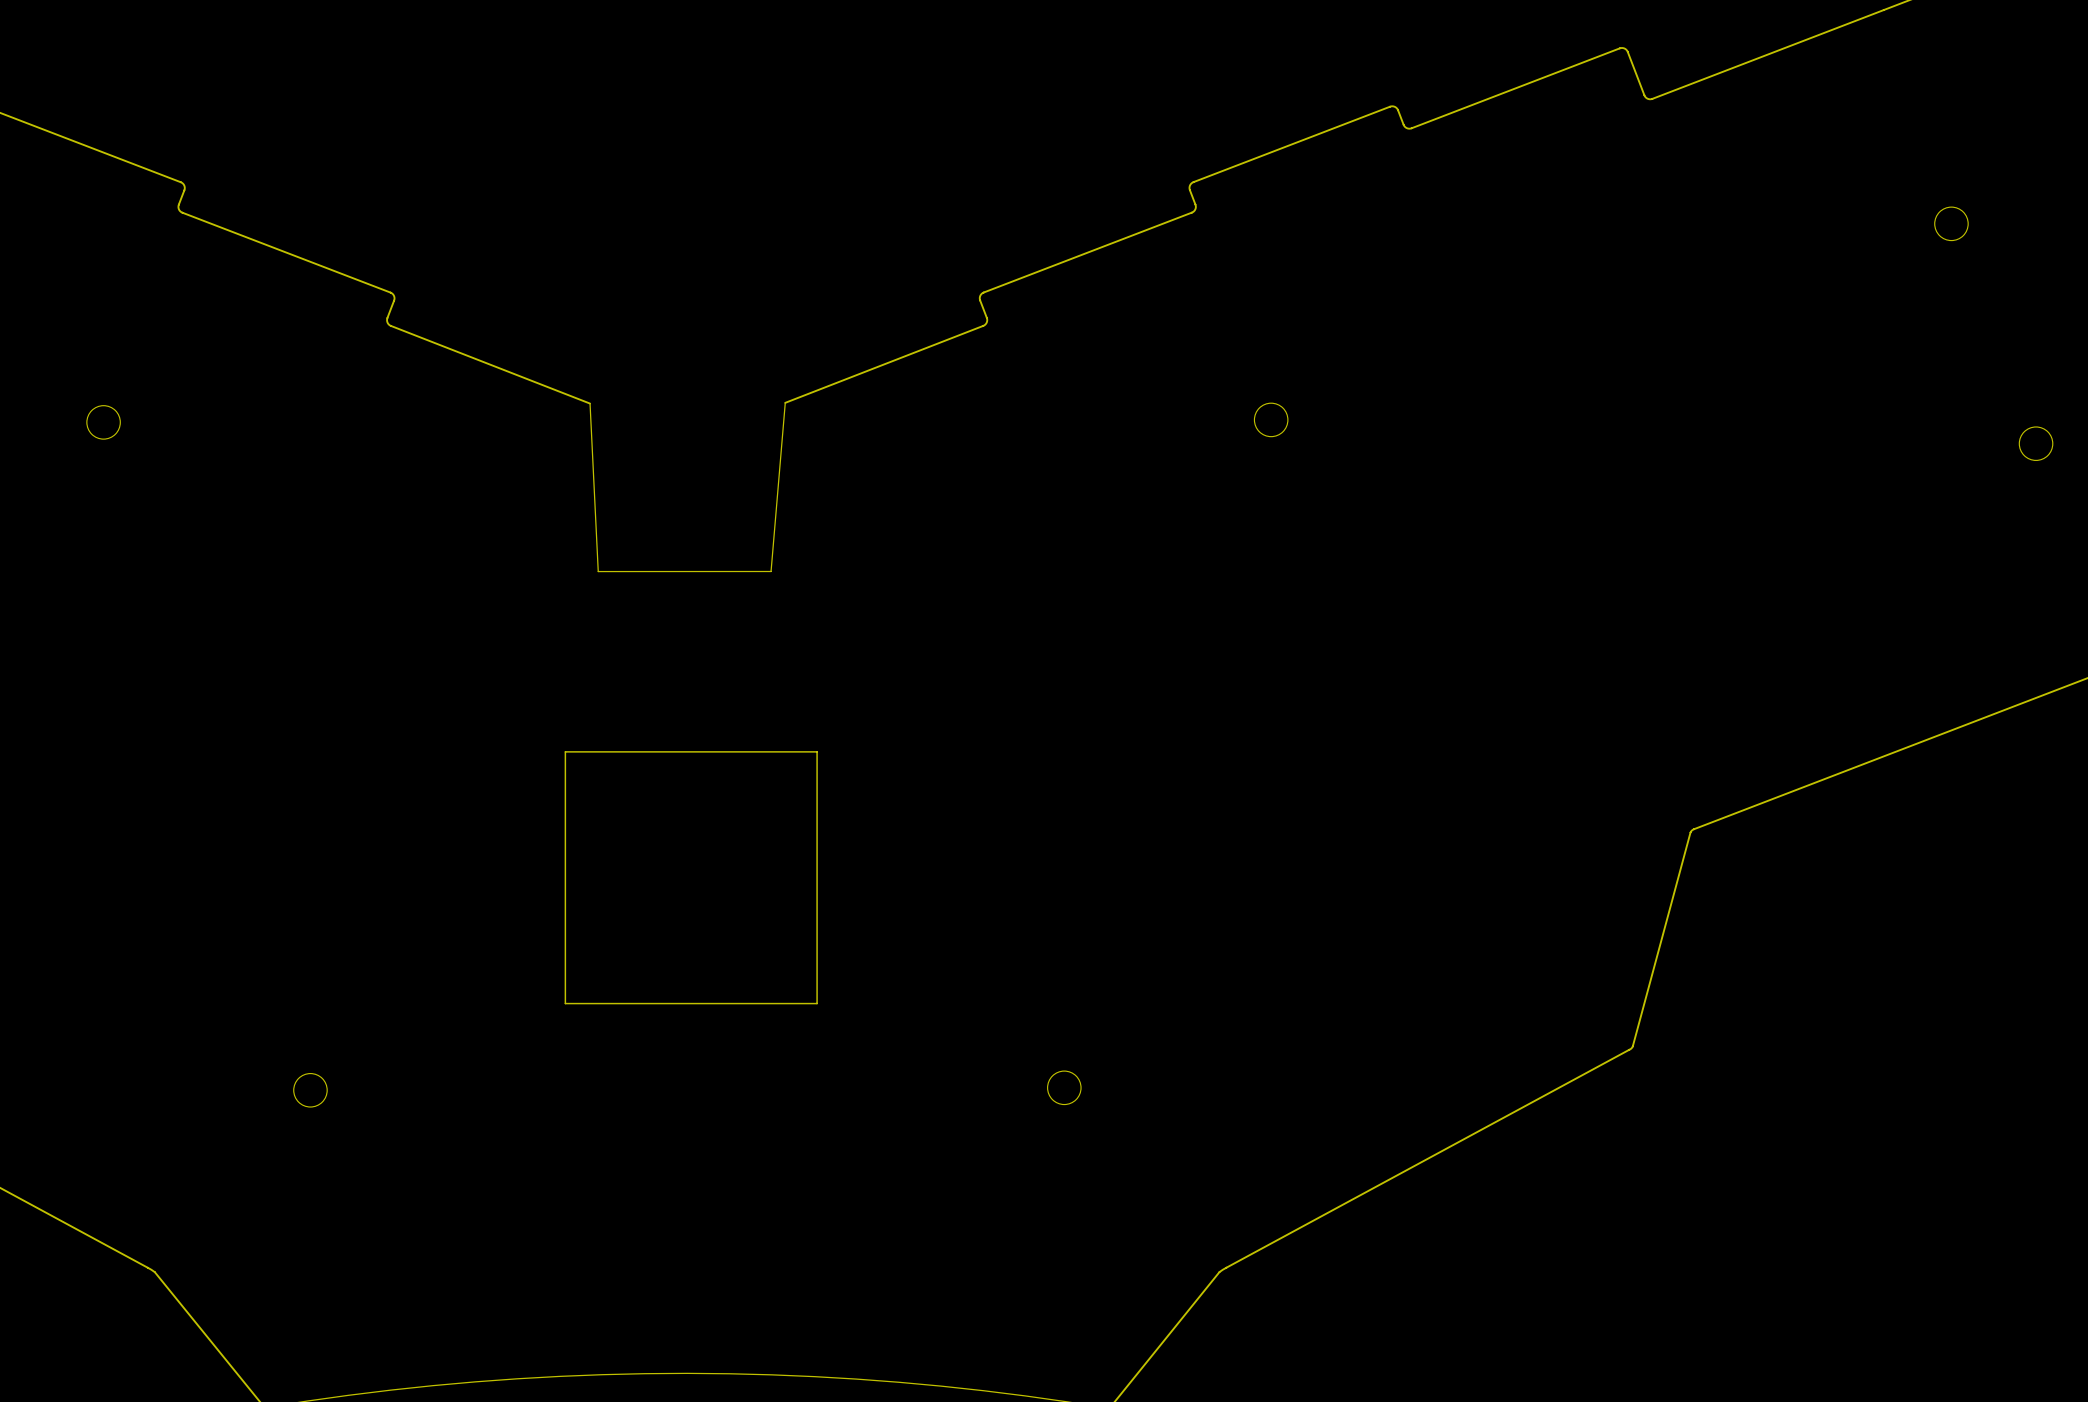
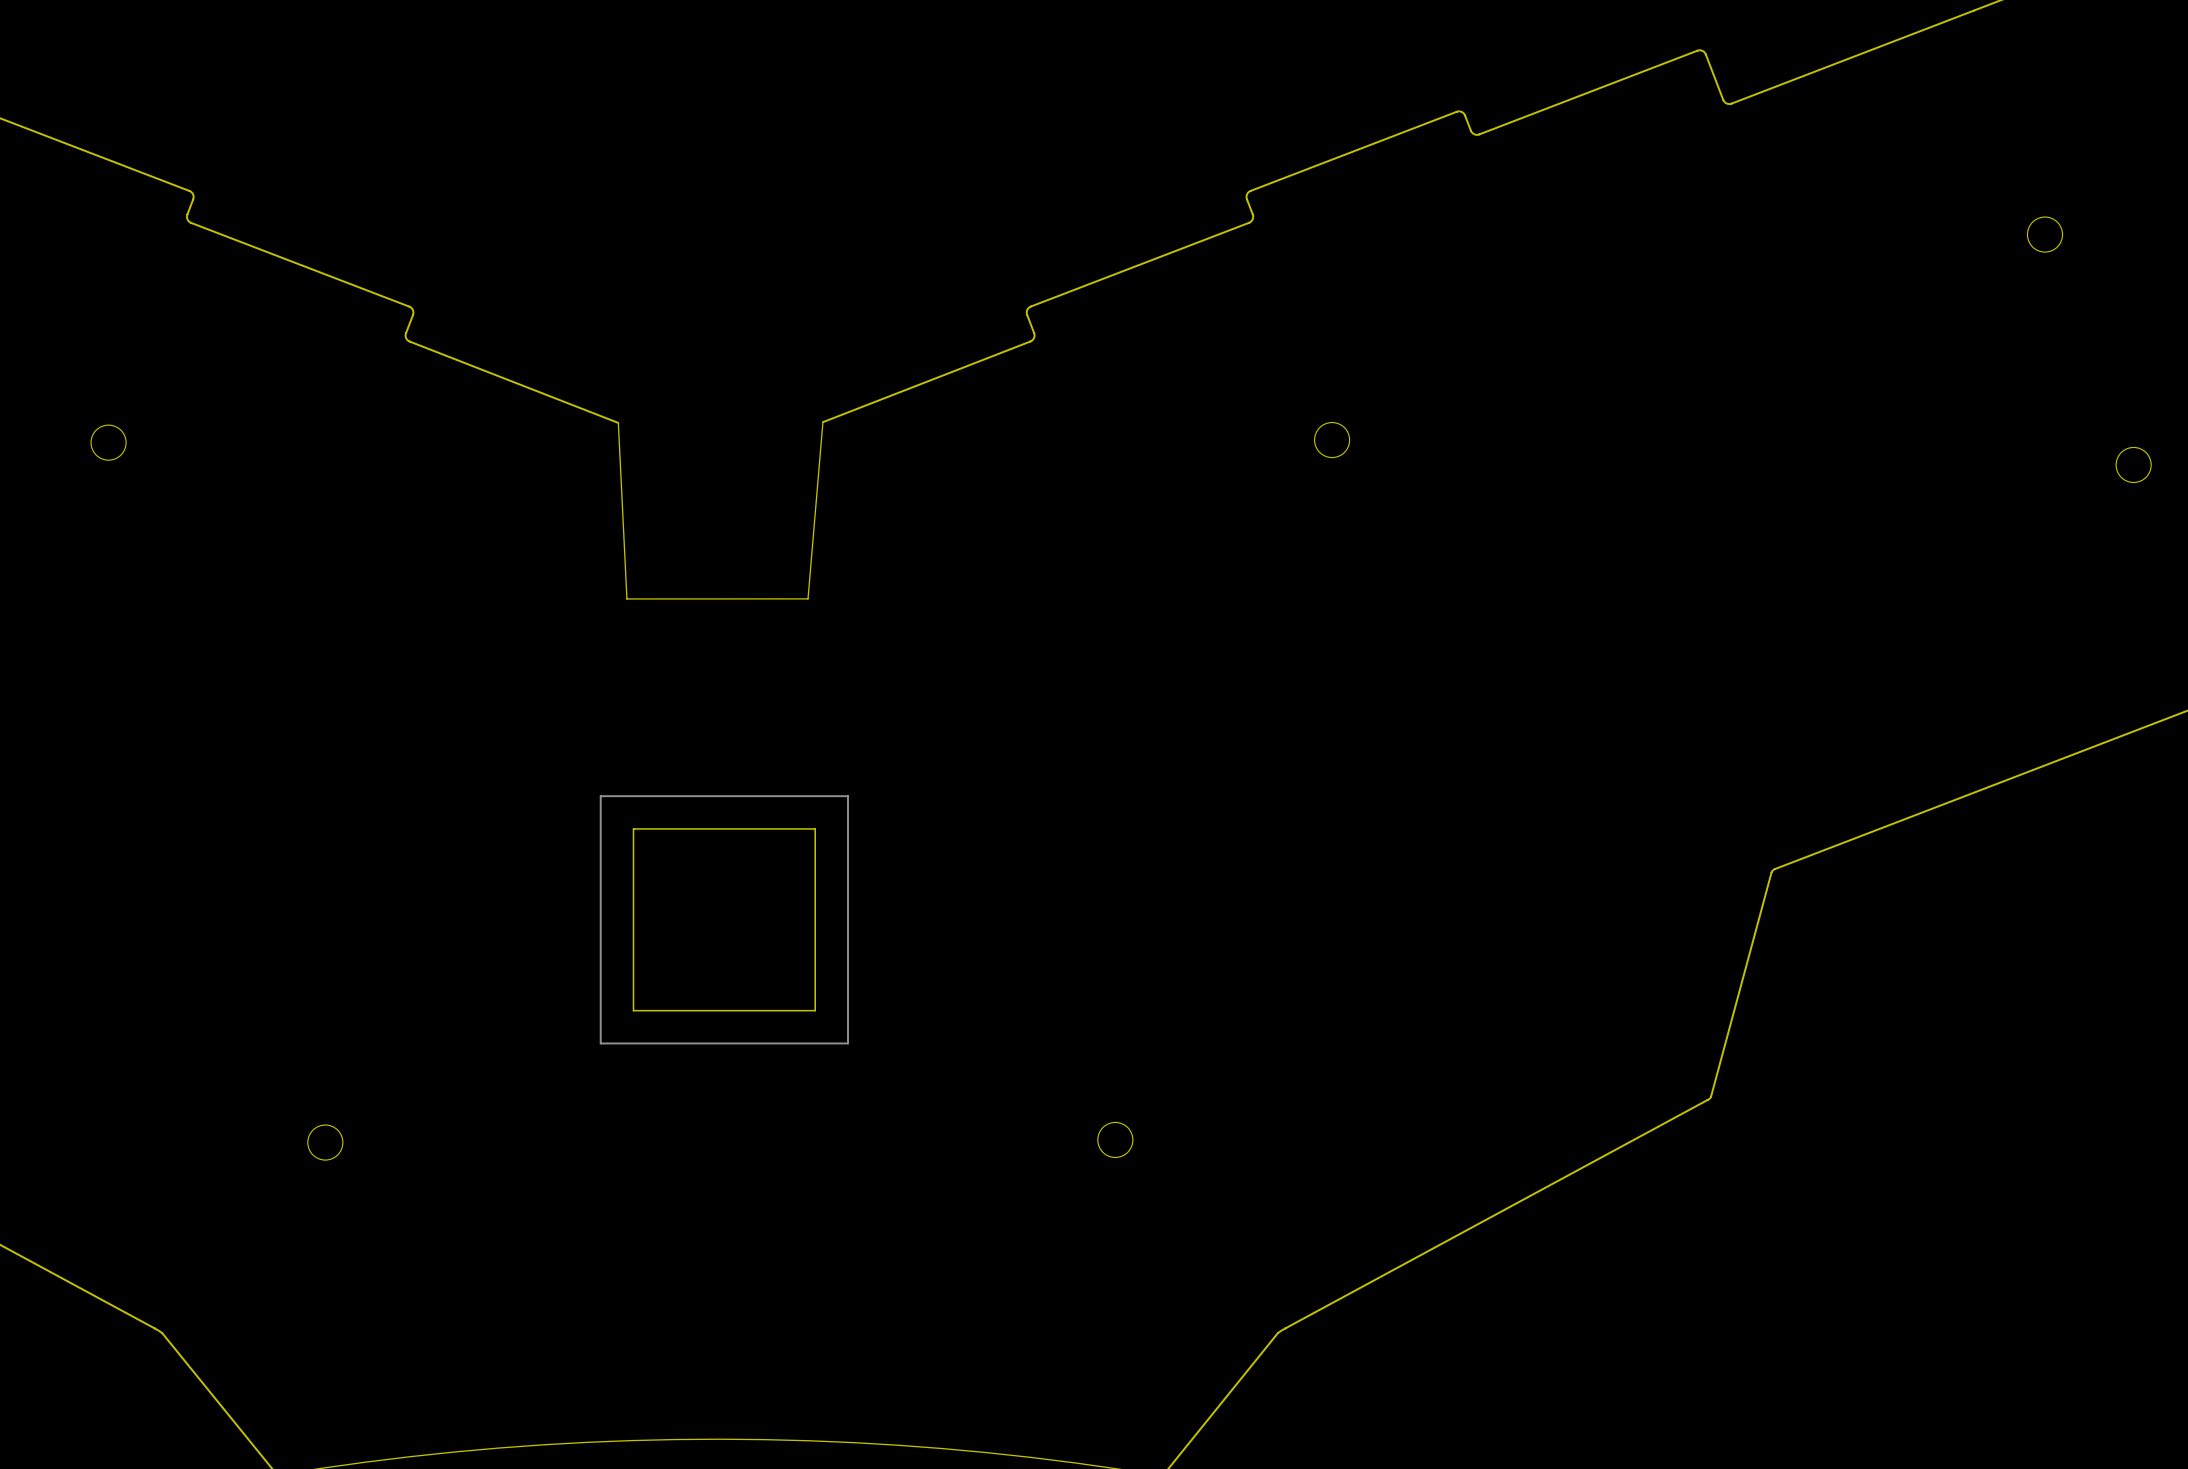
drawing shape: [564, 751, 818, 1005] -> [599, 795, 849, 1045]

